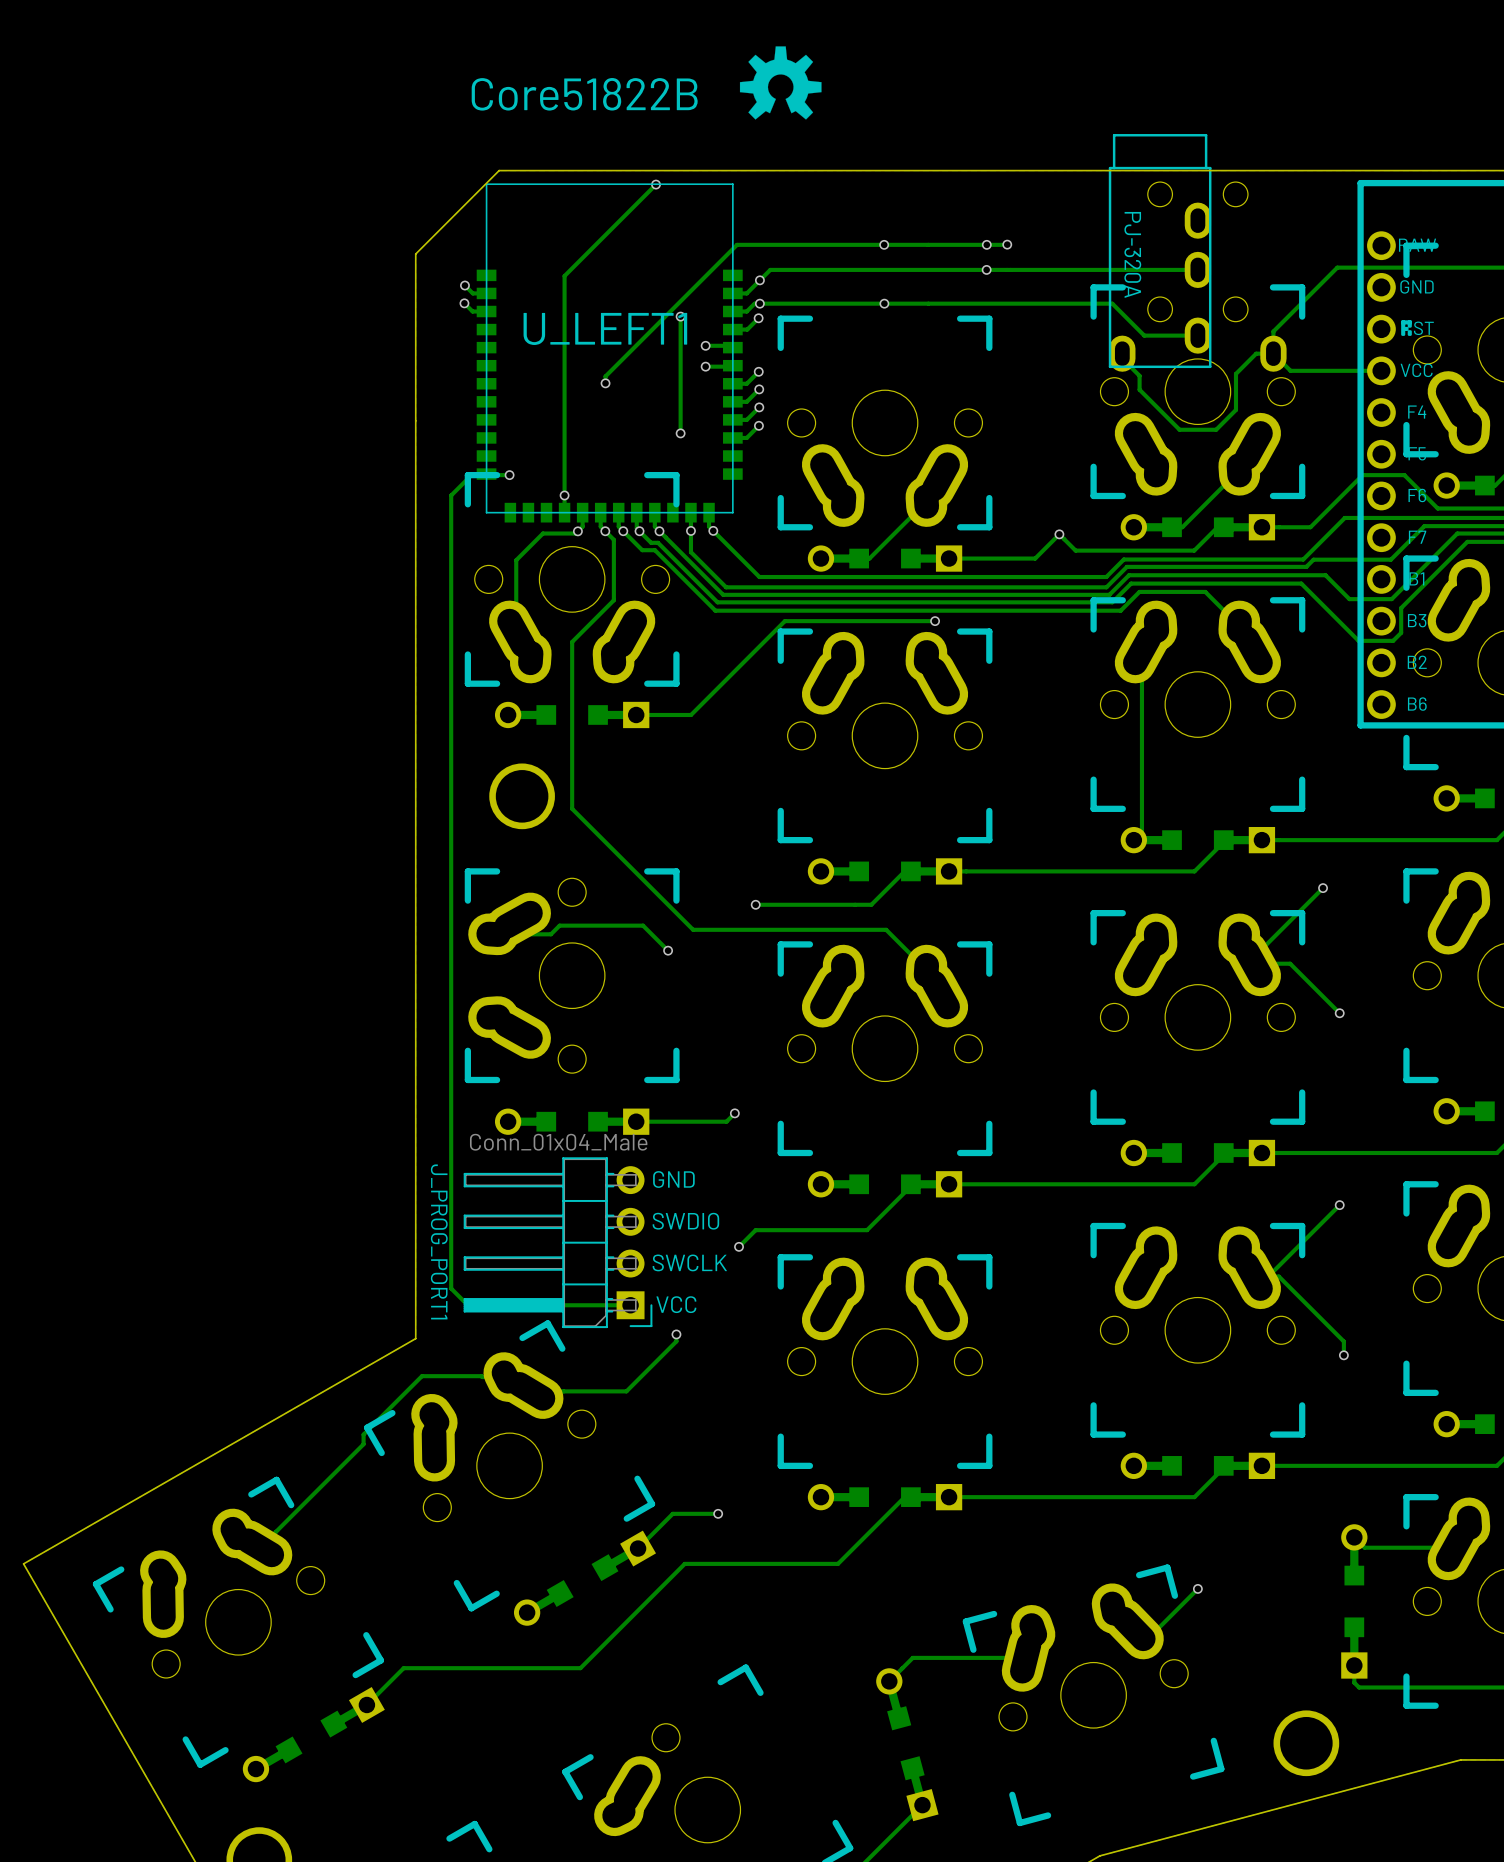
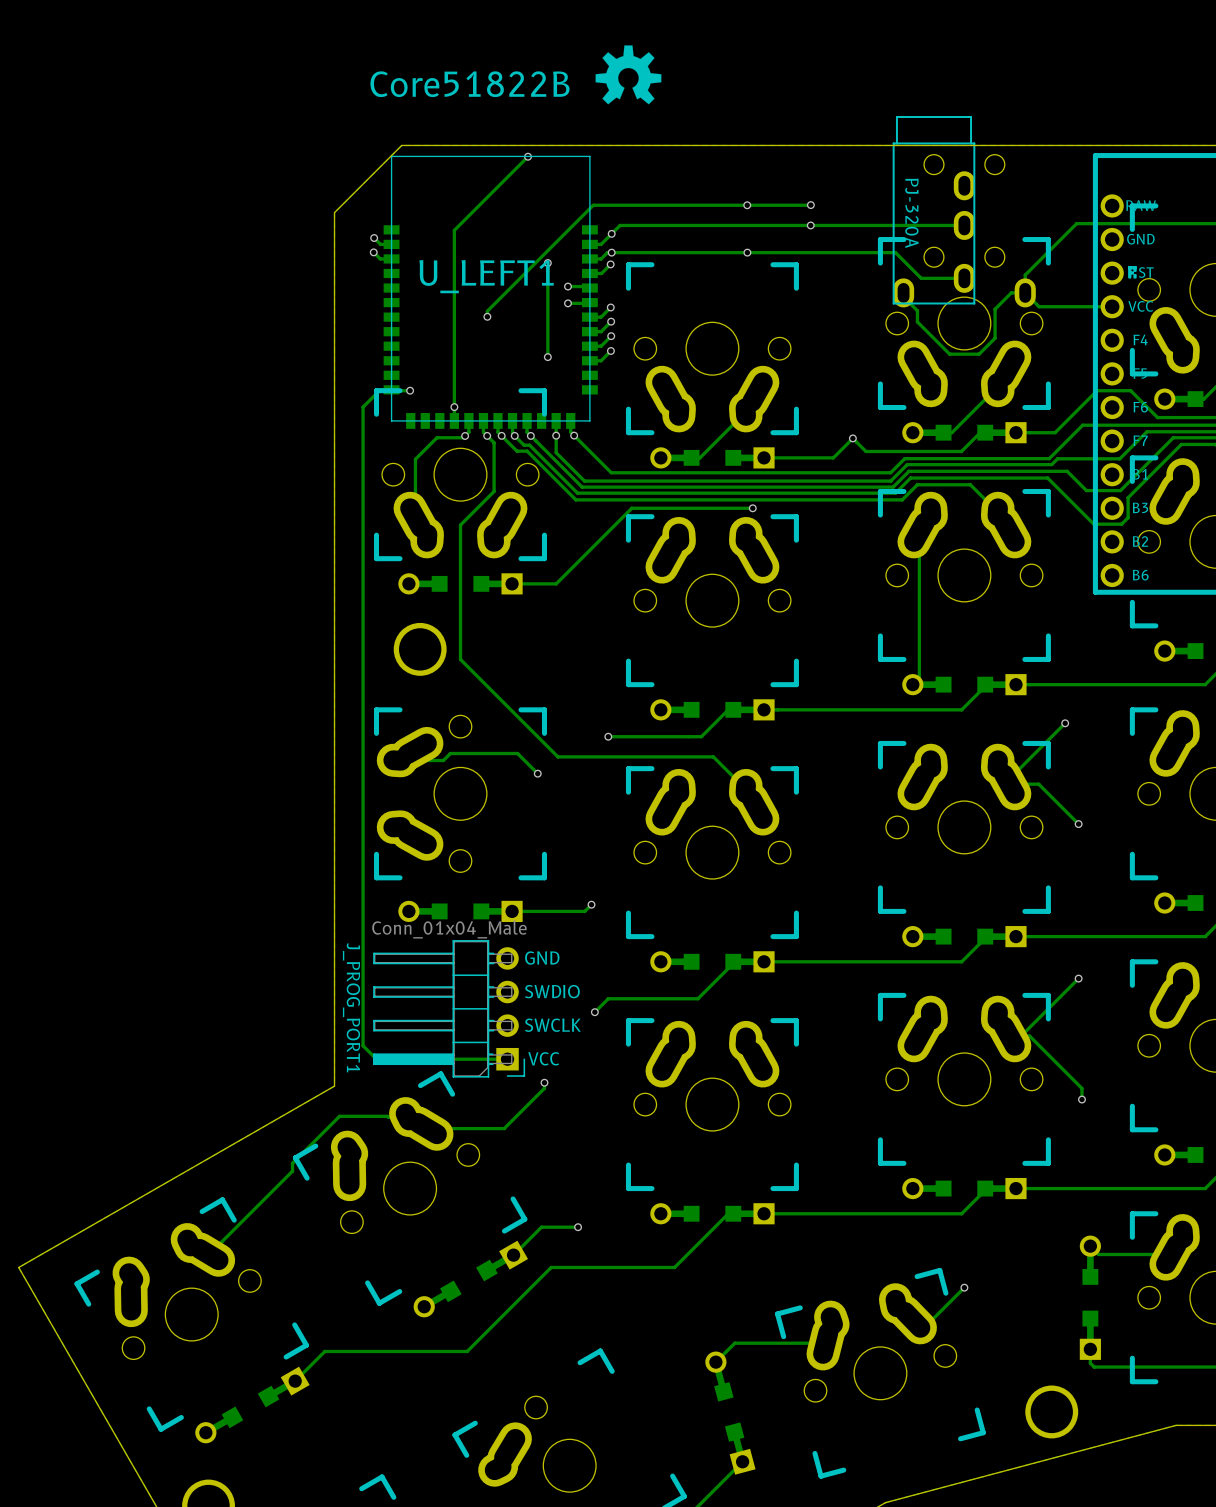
via: (884, 244) -> none
via: none -> (747, 205)
via: (986, 244) -> none
via: (986, 269) -> none
via: none -> (810, 225)
via: (884, 303) -> none
via: none -> (747, 252)

